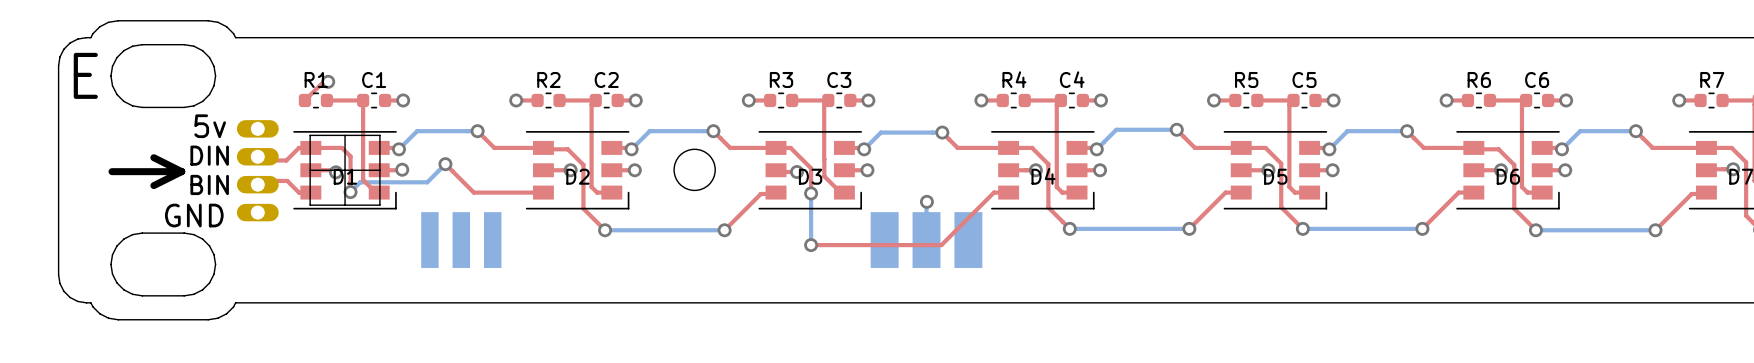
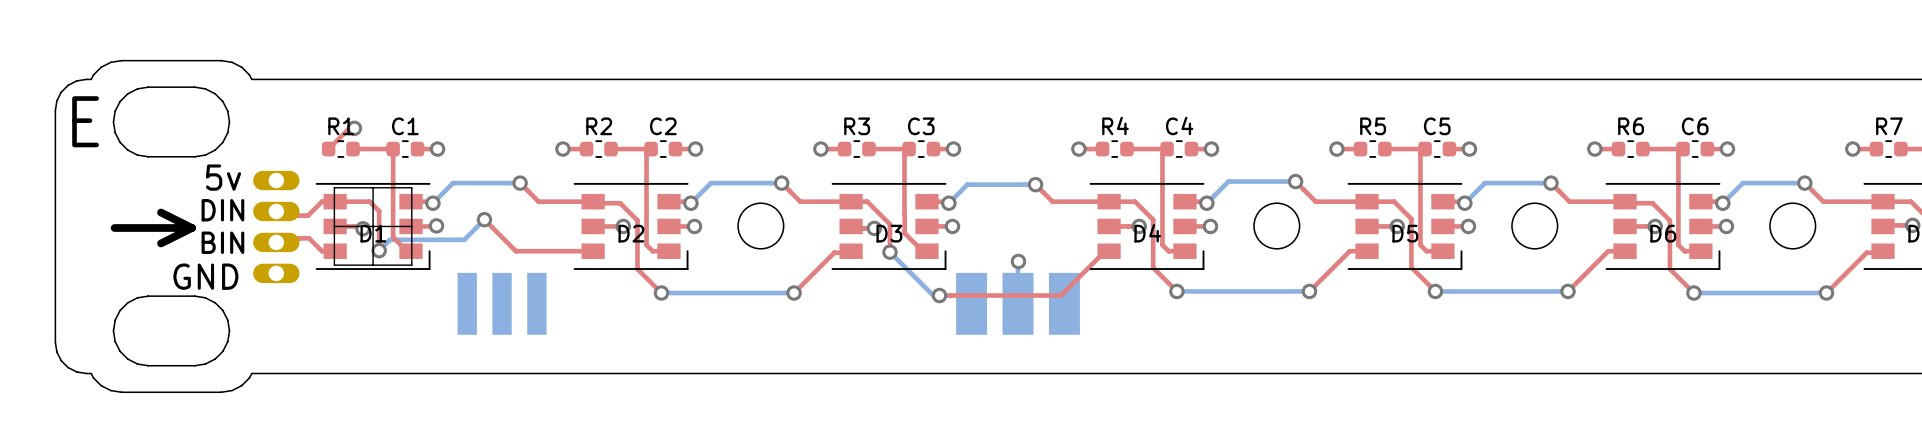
round board edge: none -> [1253, 202, 1301, 250]
round board edge: none -> [1511, 202, 1559, 250]
round board edge: none -> [1769, 202, 1817, 250]
top track: (1005, 192) (993, 192) (941, 245) (811, 245) -> (1105, 251) (1060, 295) (939, 295)
bottom track: (811, 193) (811, 245) -> (889, 252) (933, 295) (939, 295)
via position: (811, 245) -> (939, 295)

